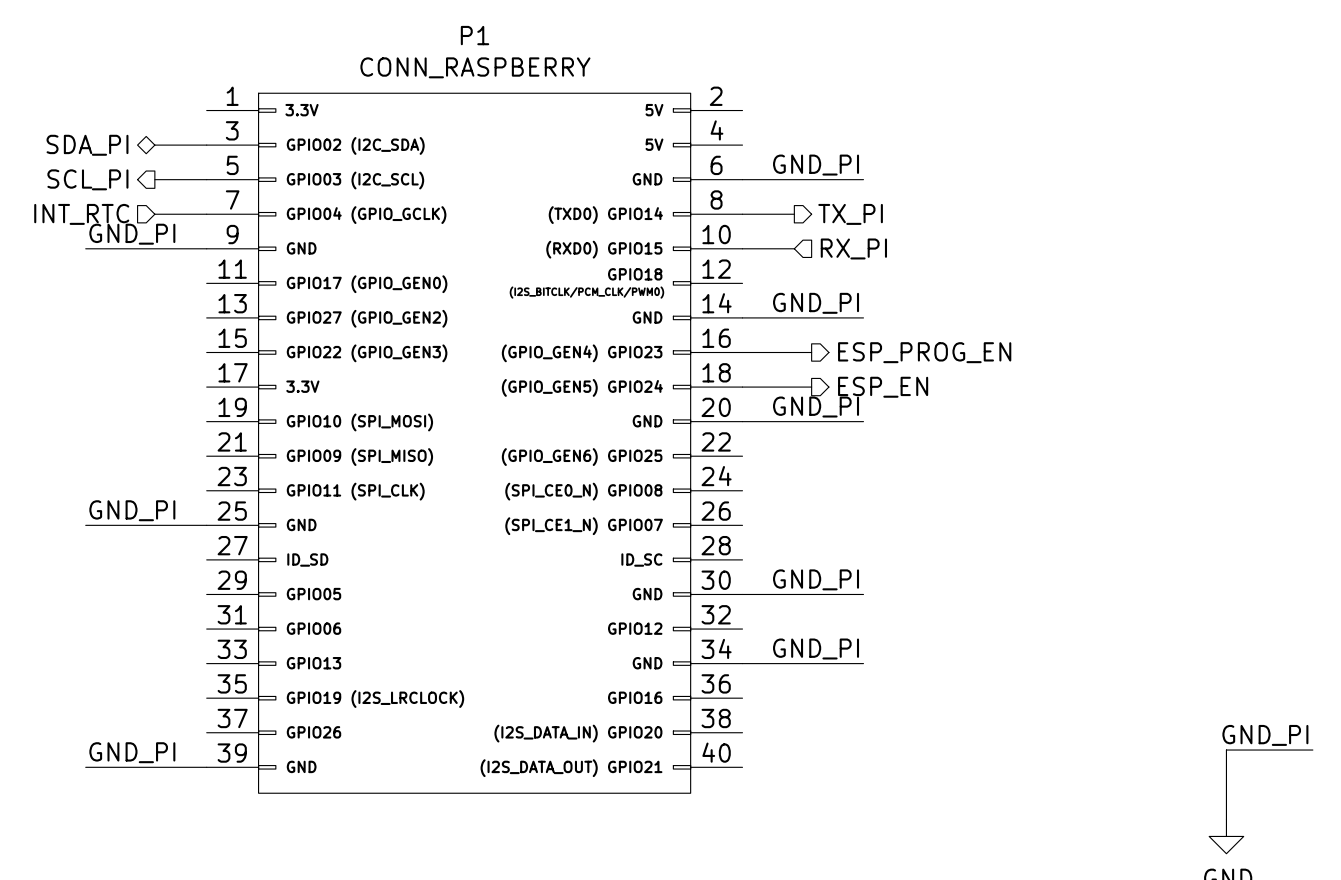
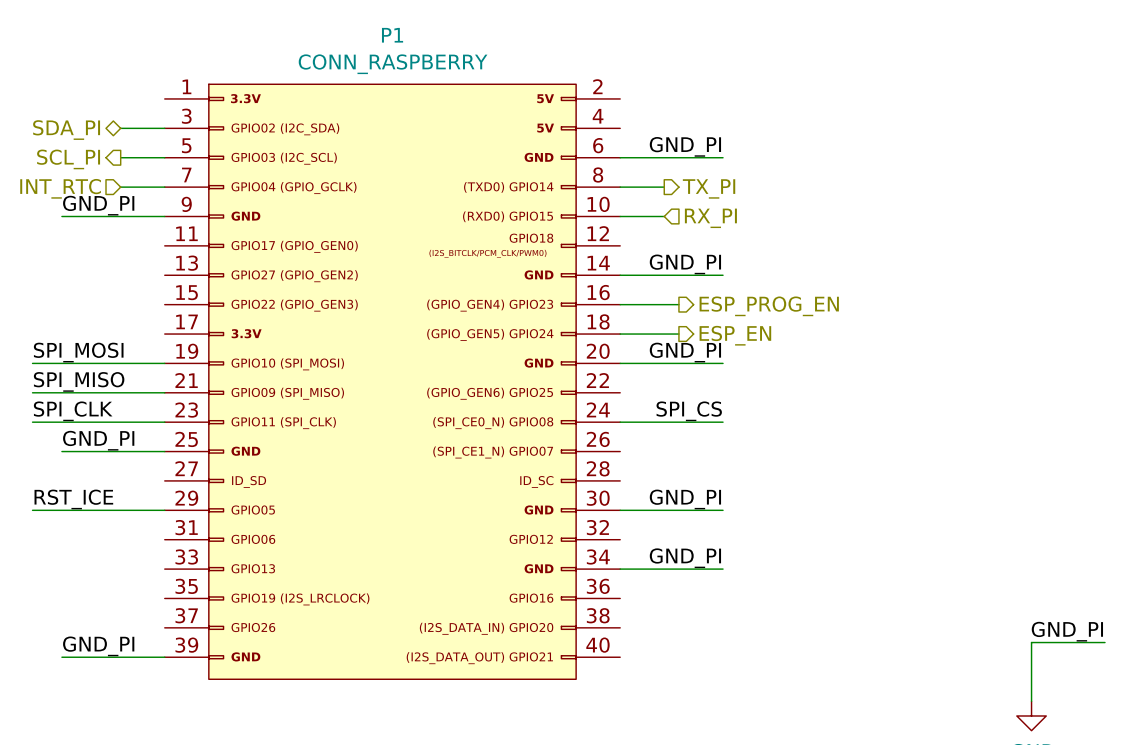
label: none -> SPI_MOSI (78, 352)
wire: none -> (32, 363) (164, 363)
label: none -> SPI_MISO (79, 381)
wire: none -> (32, 392) (164, 392)
label: none -> SPI_CLK (73, 411)
label: none -> SPI_CS (689, 411)
wire: none -> (32, 422) (164, 422)
wire: none -> (620, 422) (723, 422)
label: none -> RST_ICE (73, 499)
wire: none -> (32, 510) (164, 510)

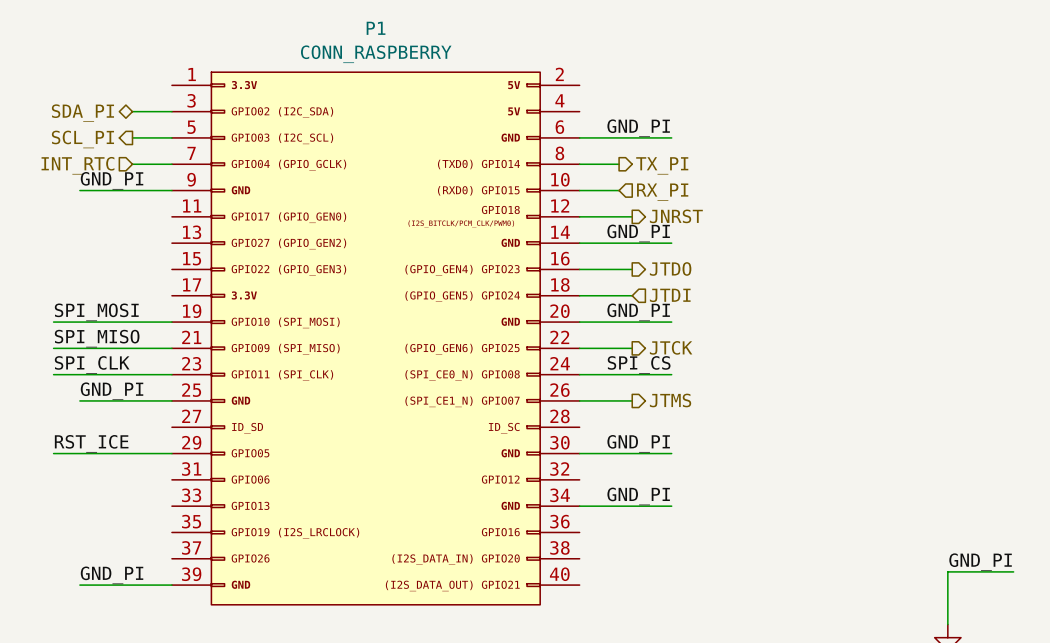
wire: none -> (579, 216) (632, 216)
hierarchical label: none -> JNRST (676, 216)
hierarchical label: ESP_PROG_EN (769, 306) -> JTDO (670, 268)
hierarchical label shape: output (735, 335) -> input (670, 295)
hierarchical label: ESP_EN (735, 335) -> JTDI (670, 295)
wire: none -> (579, 348) (632, 348)
hierarchical label: none -> JTCK (671, 347)
wire: none -> (579, 400) (632, 400)
hierarchical label: none -> JTMS (670, 400)

